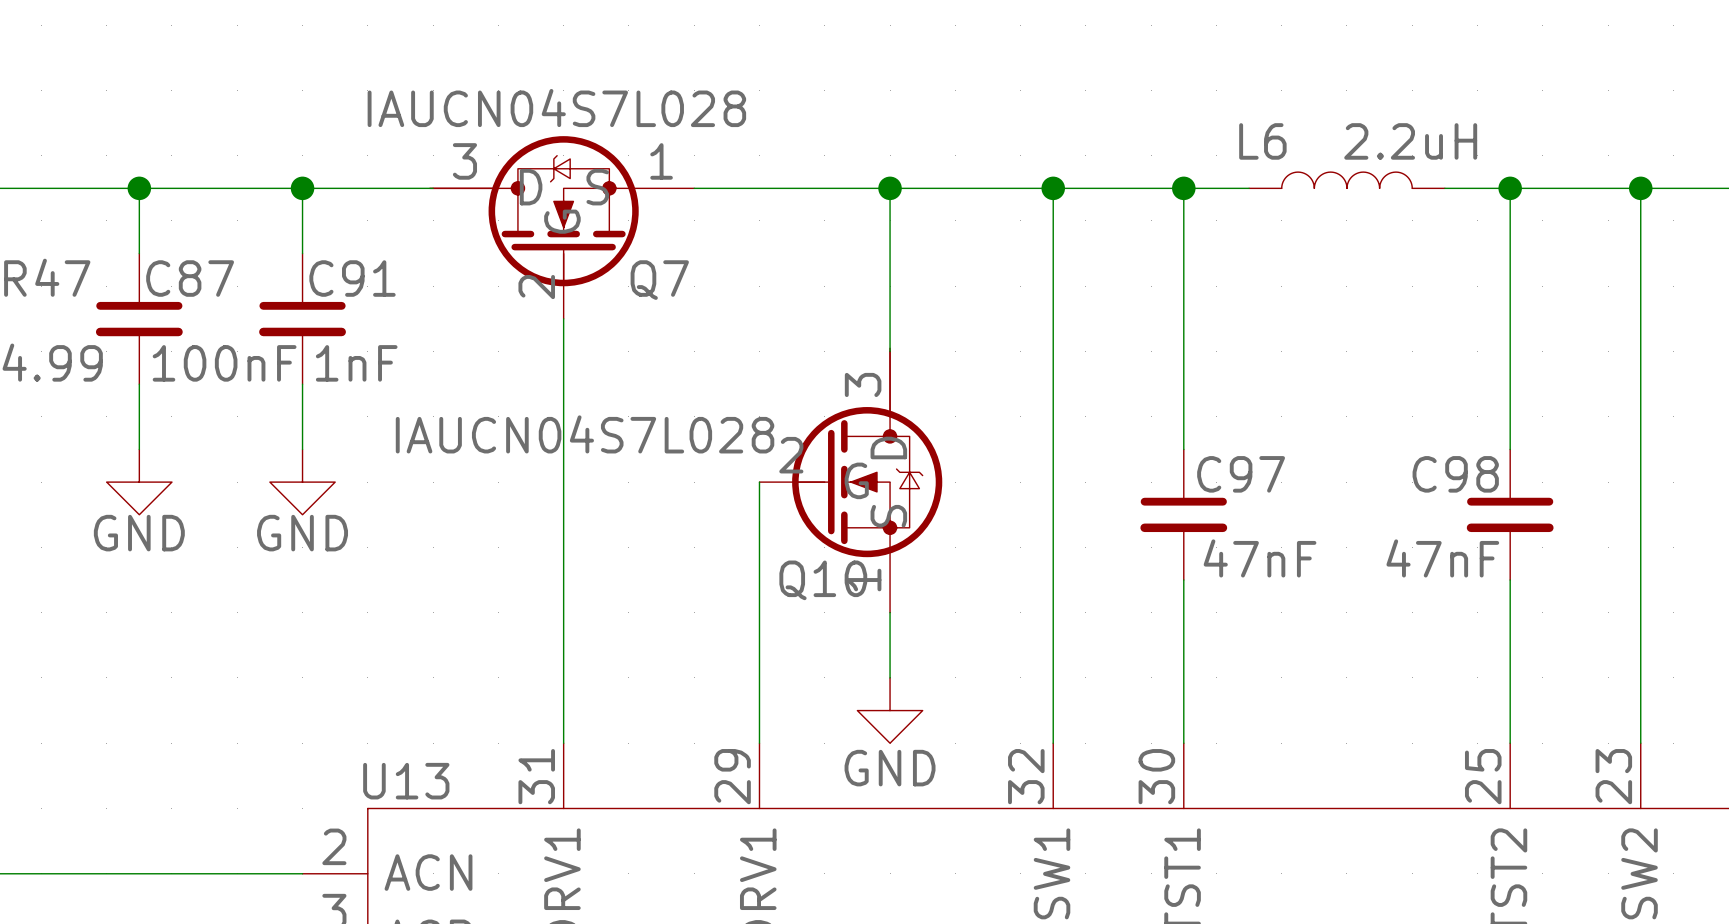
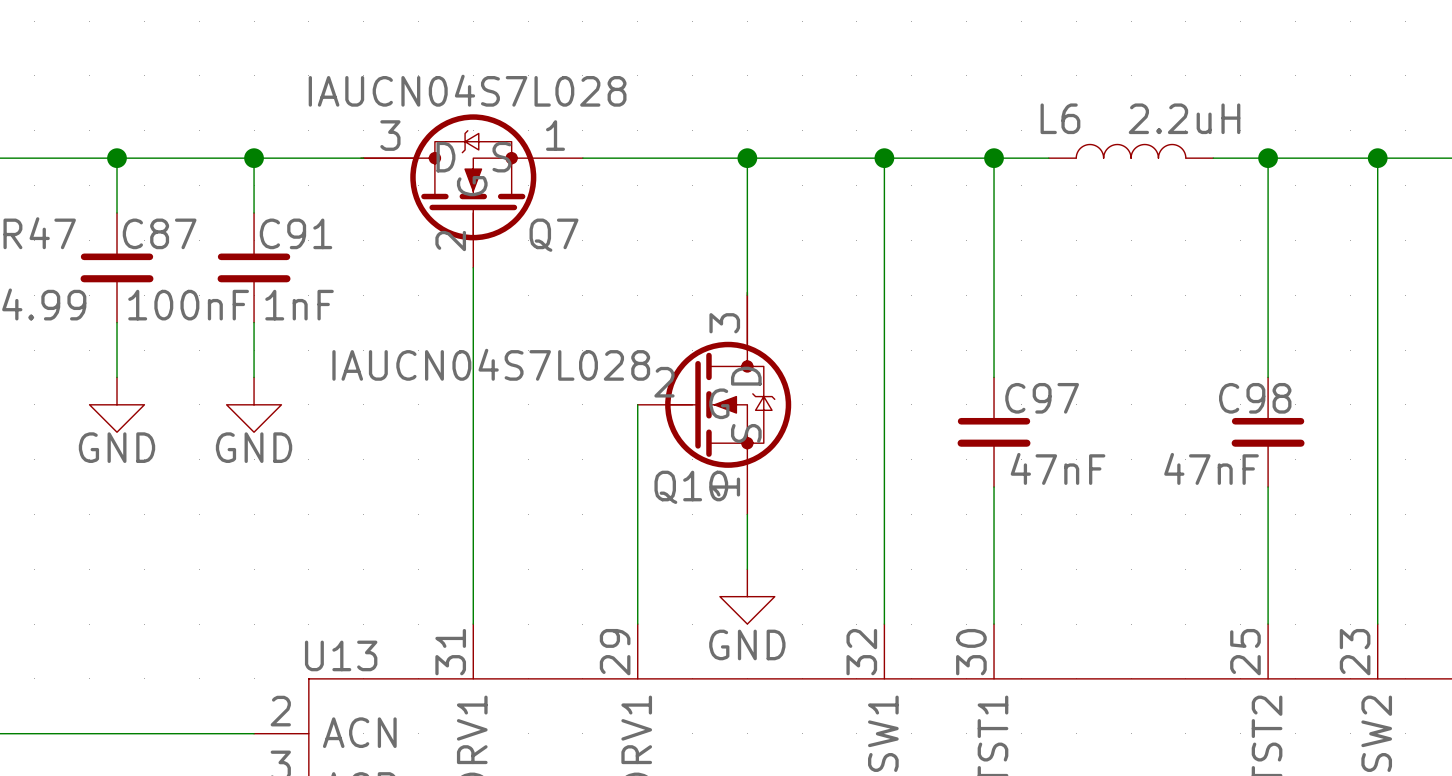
C98 name position: C98 (1455, 474) -> C98 (1255, 398)

